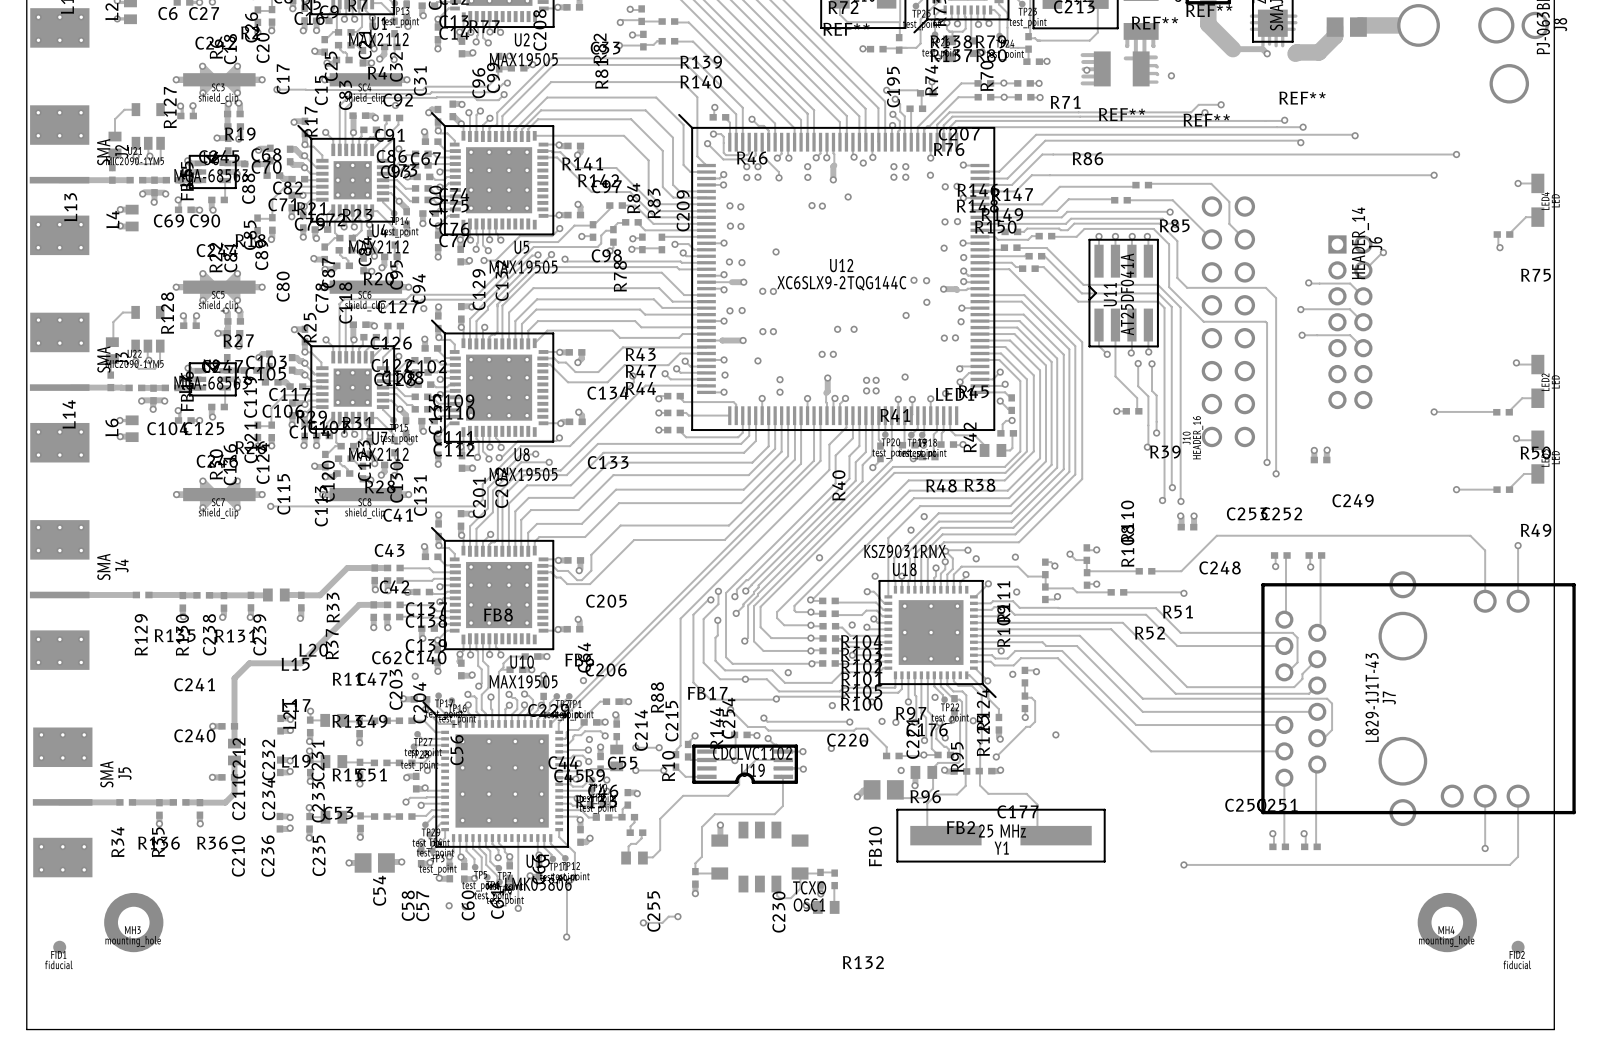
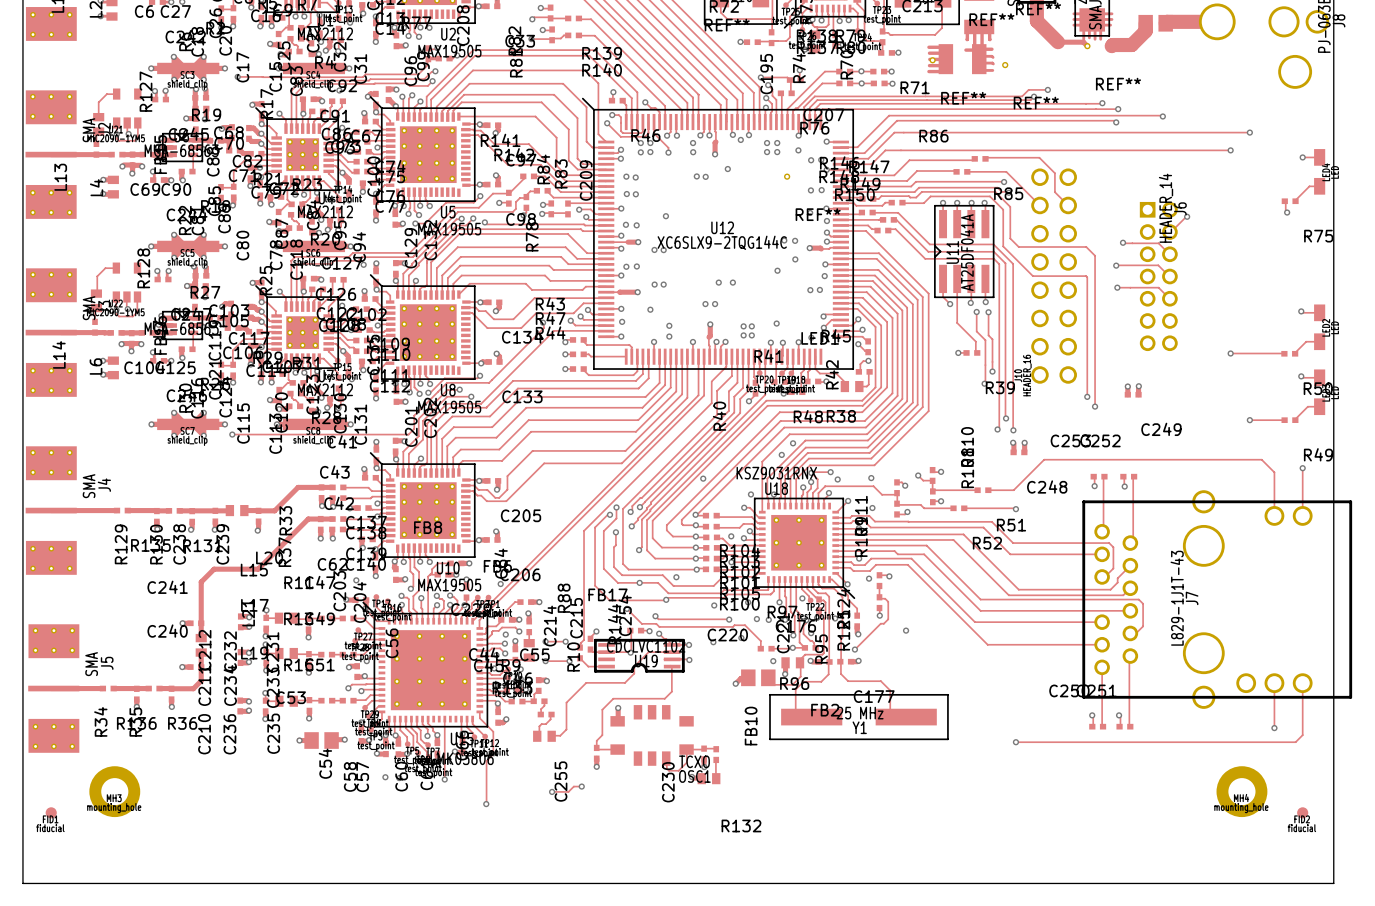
REF**: none -> (787, 176)

